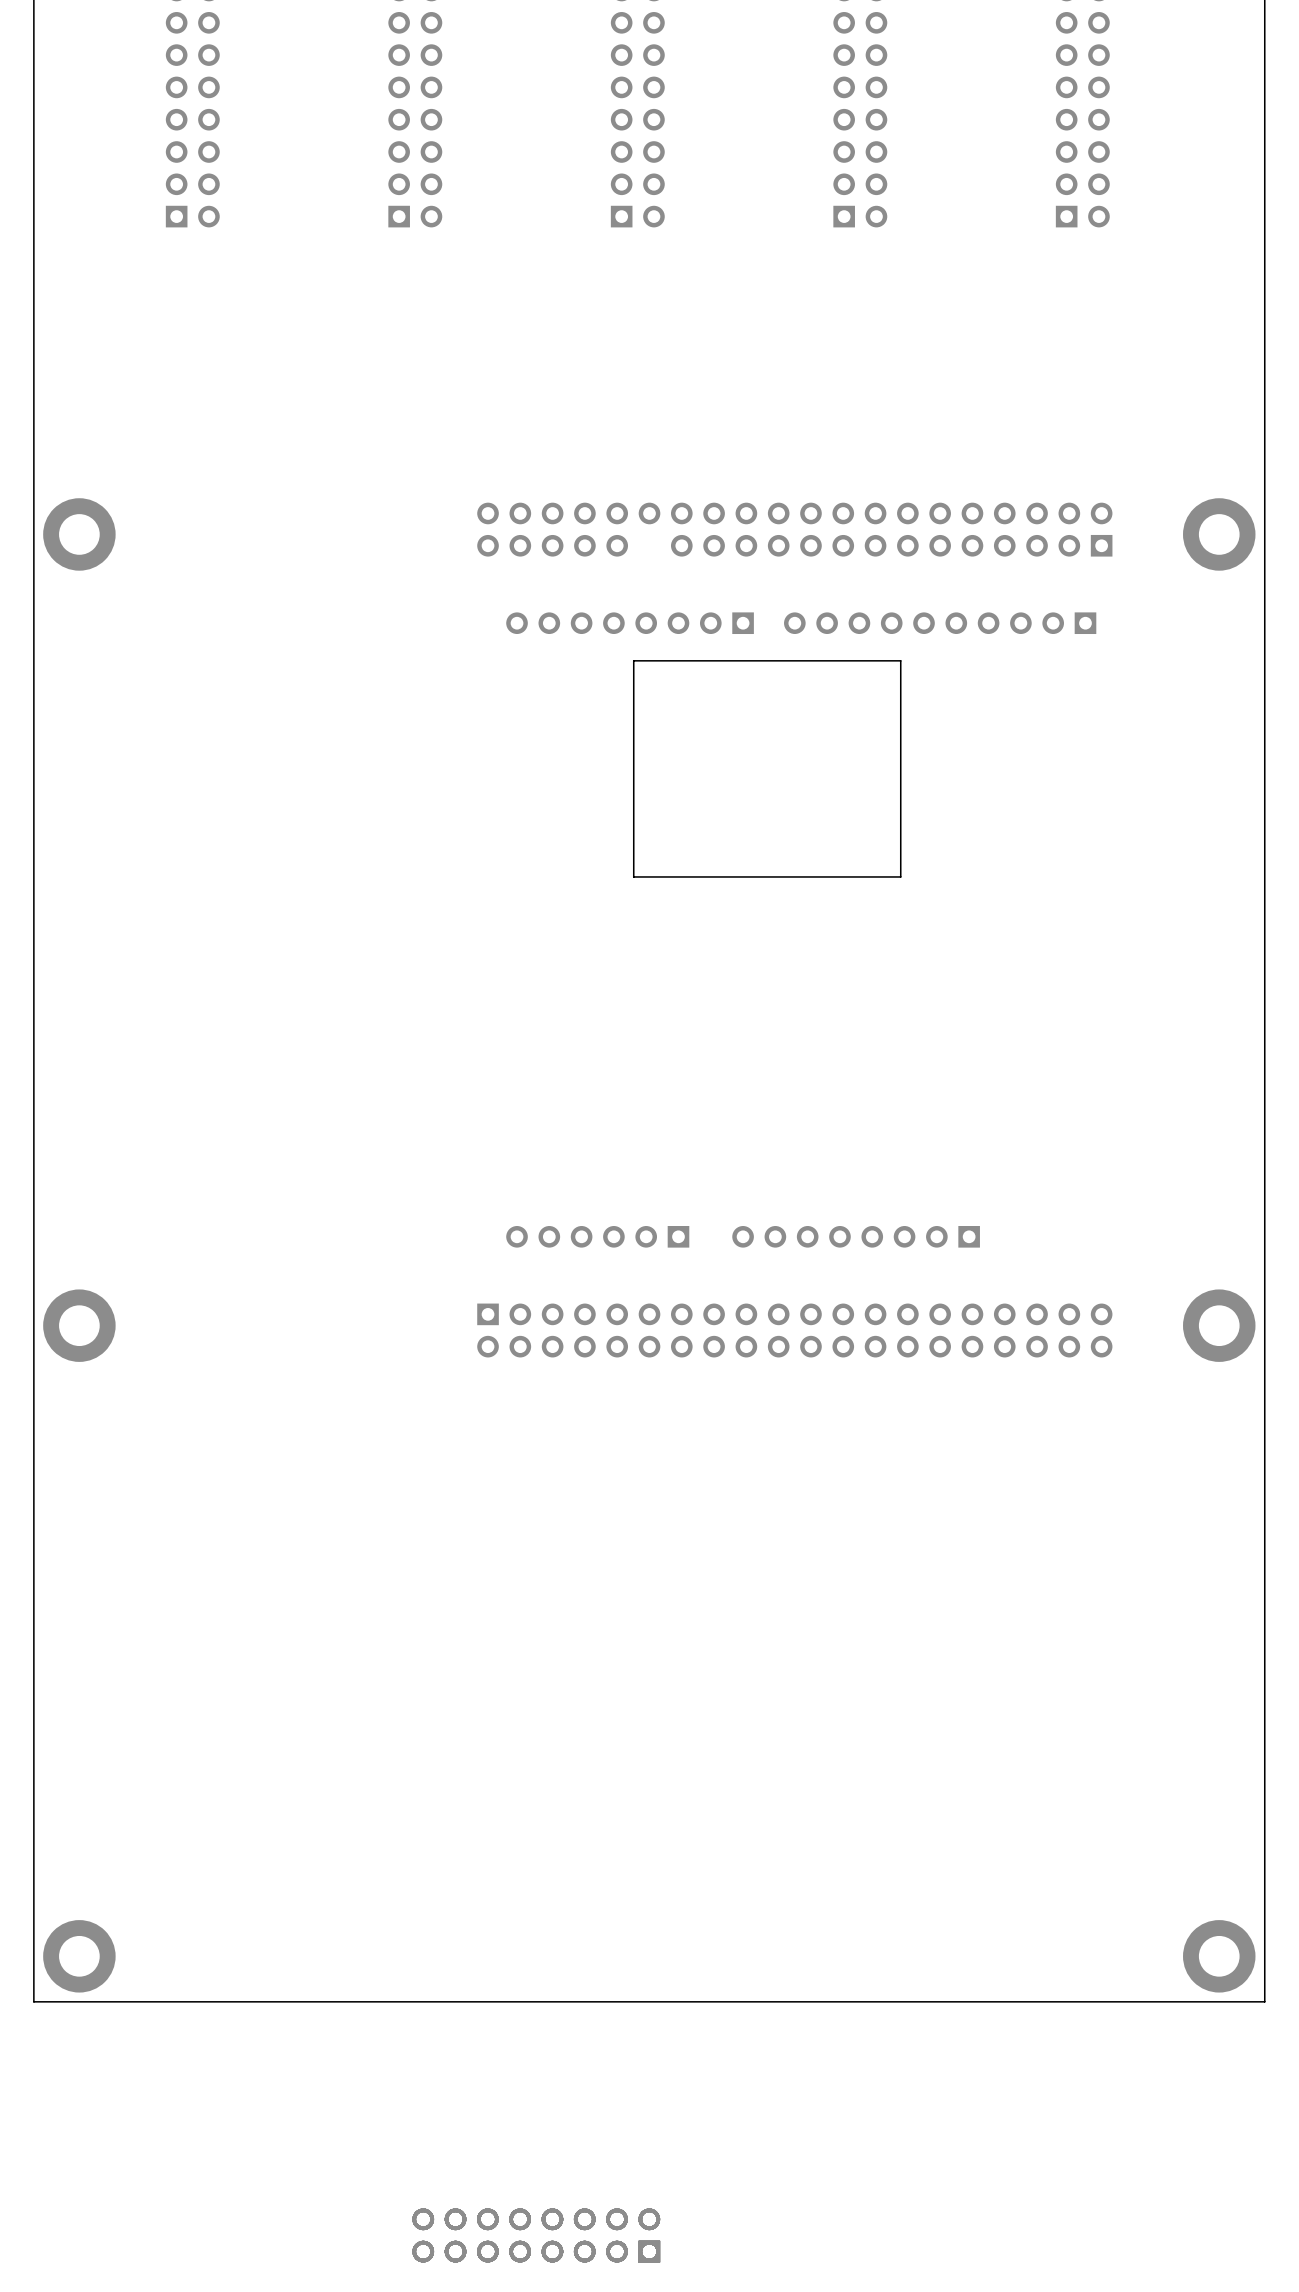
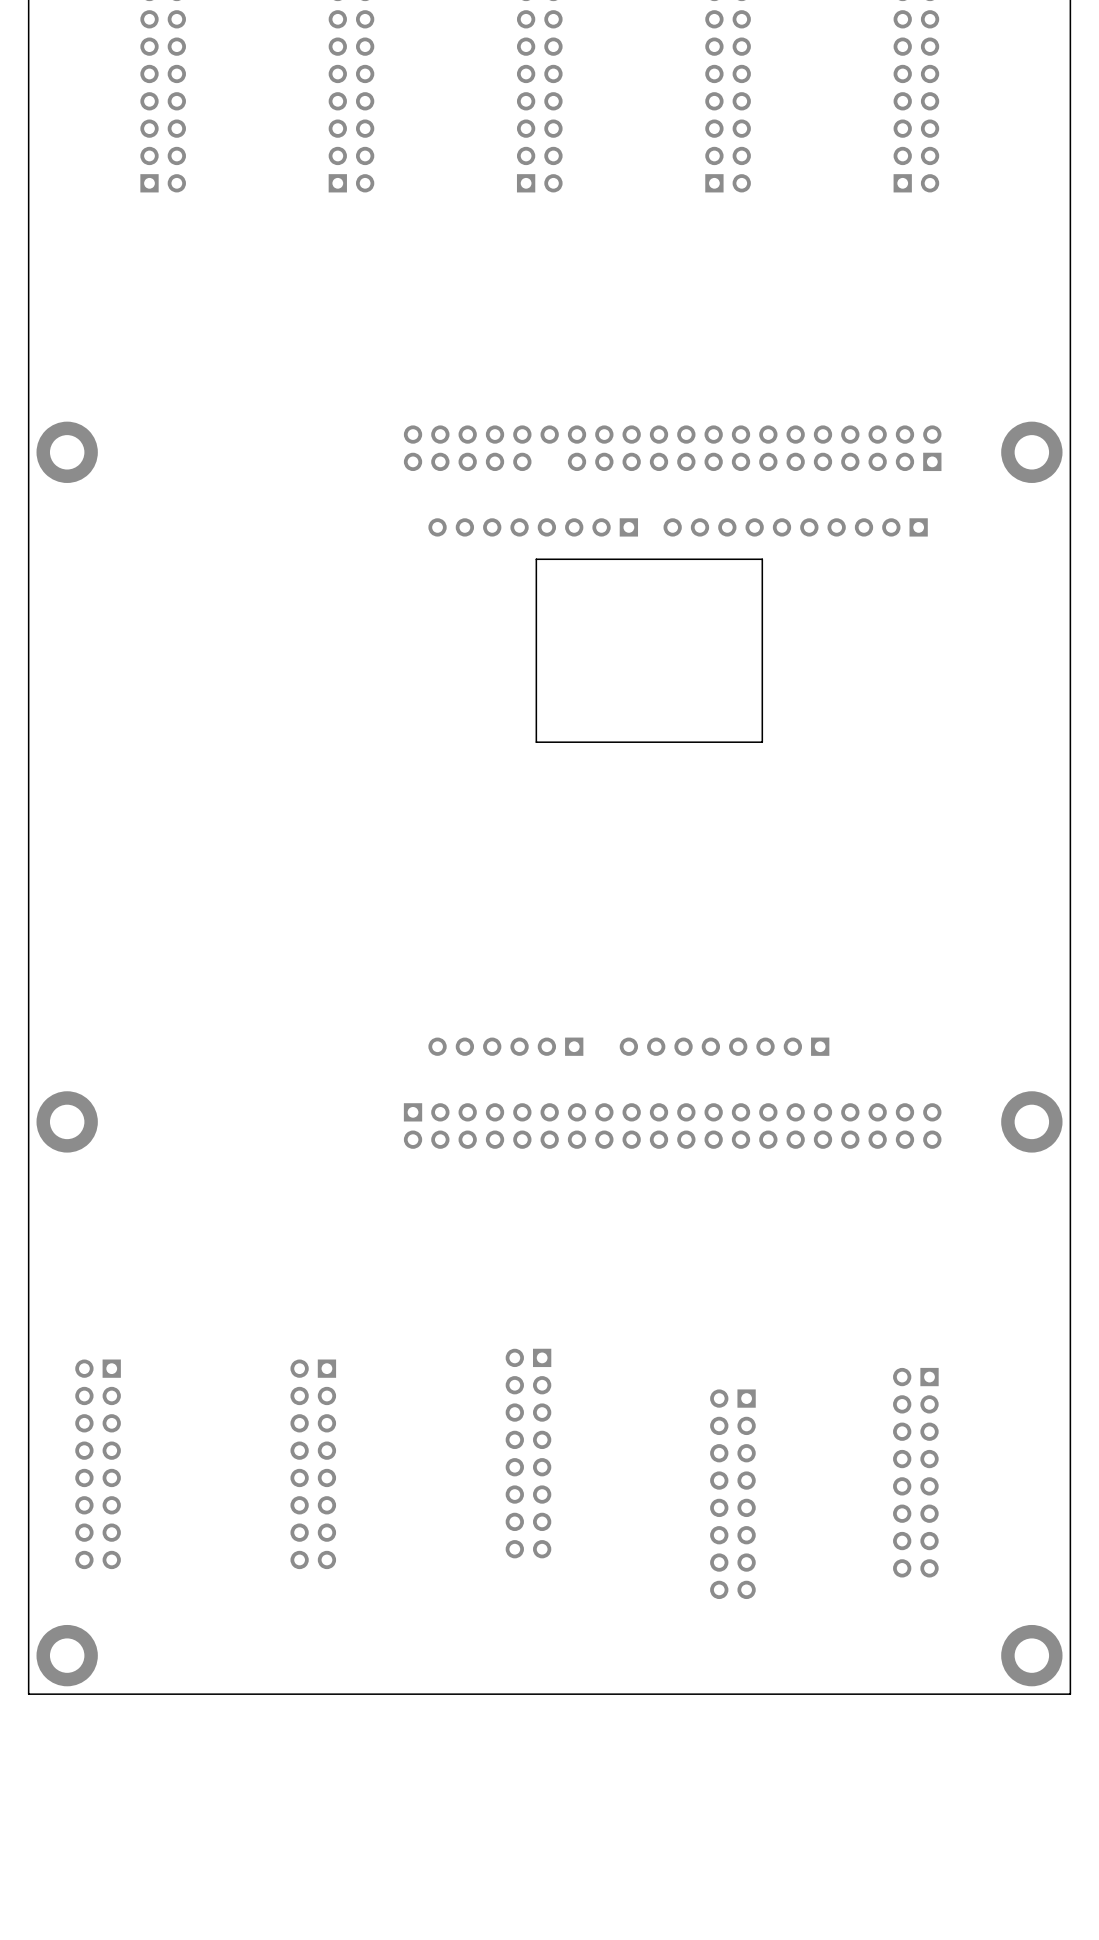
part: none -> (528, 1453)
part: none -> (98, 1464)
part: none -> (313, 1464)
part: none -> (915, 1472)
part: none -> (732, 1494)
part: (536, 2235) -> none

